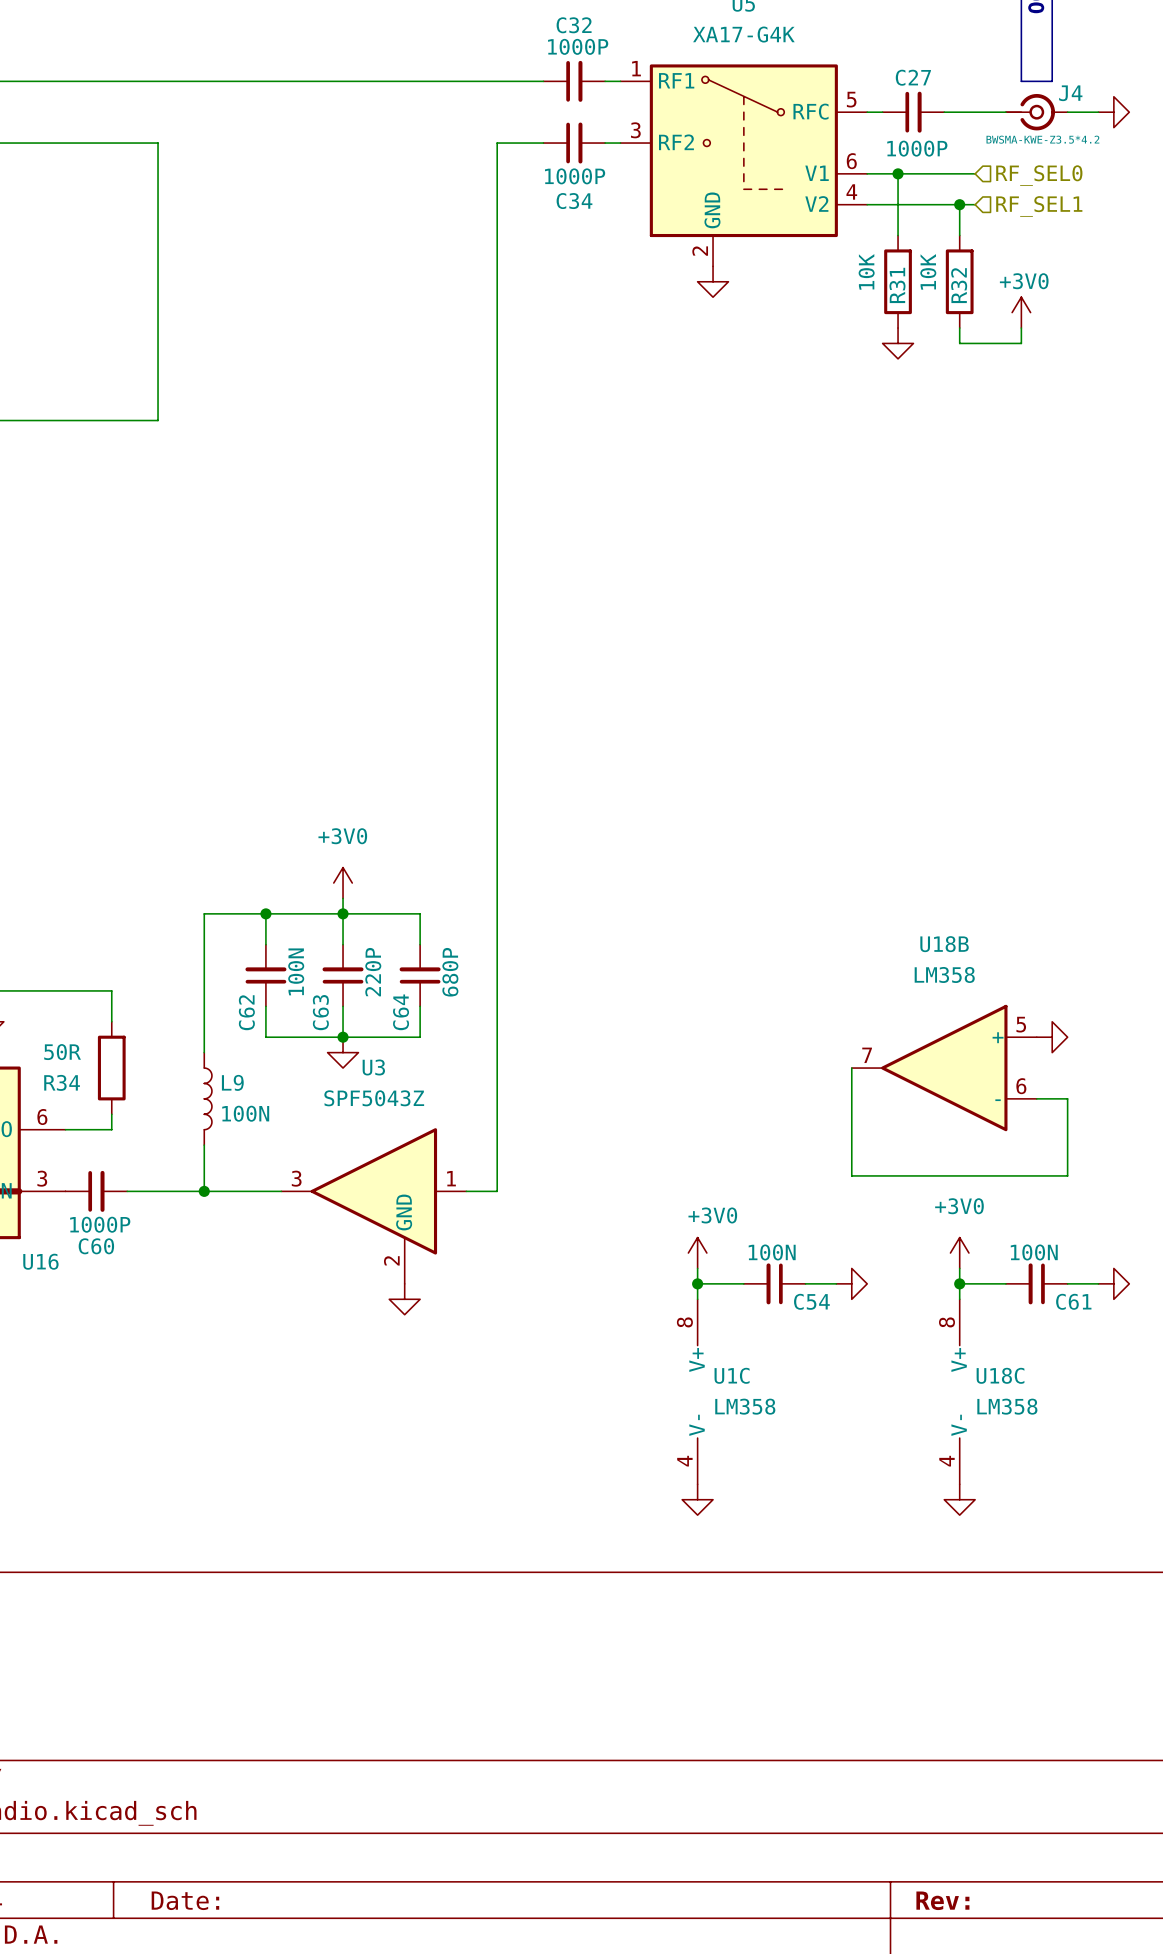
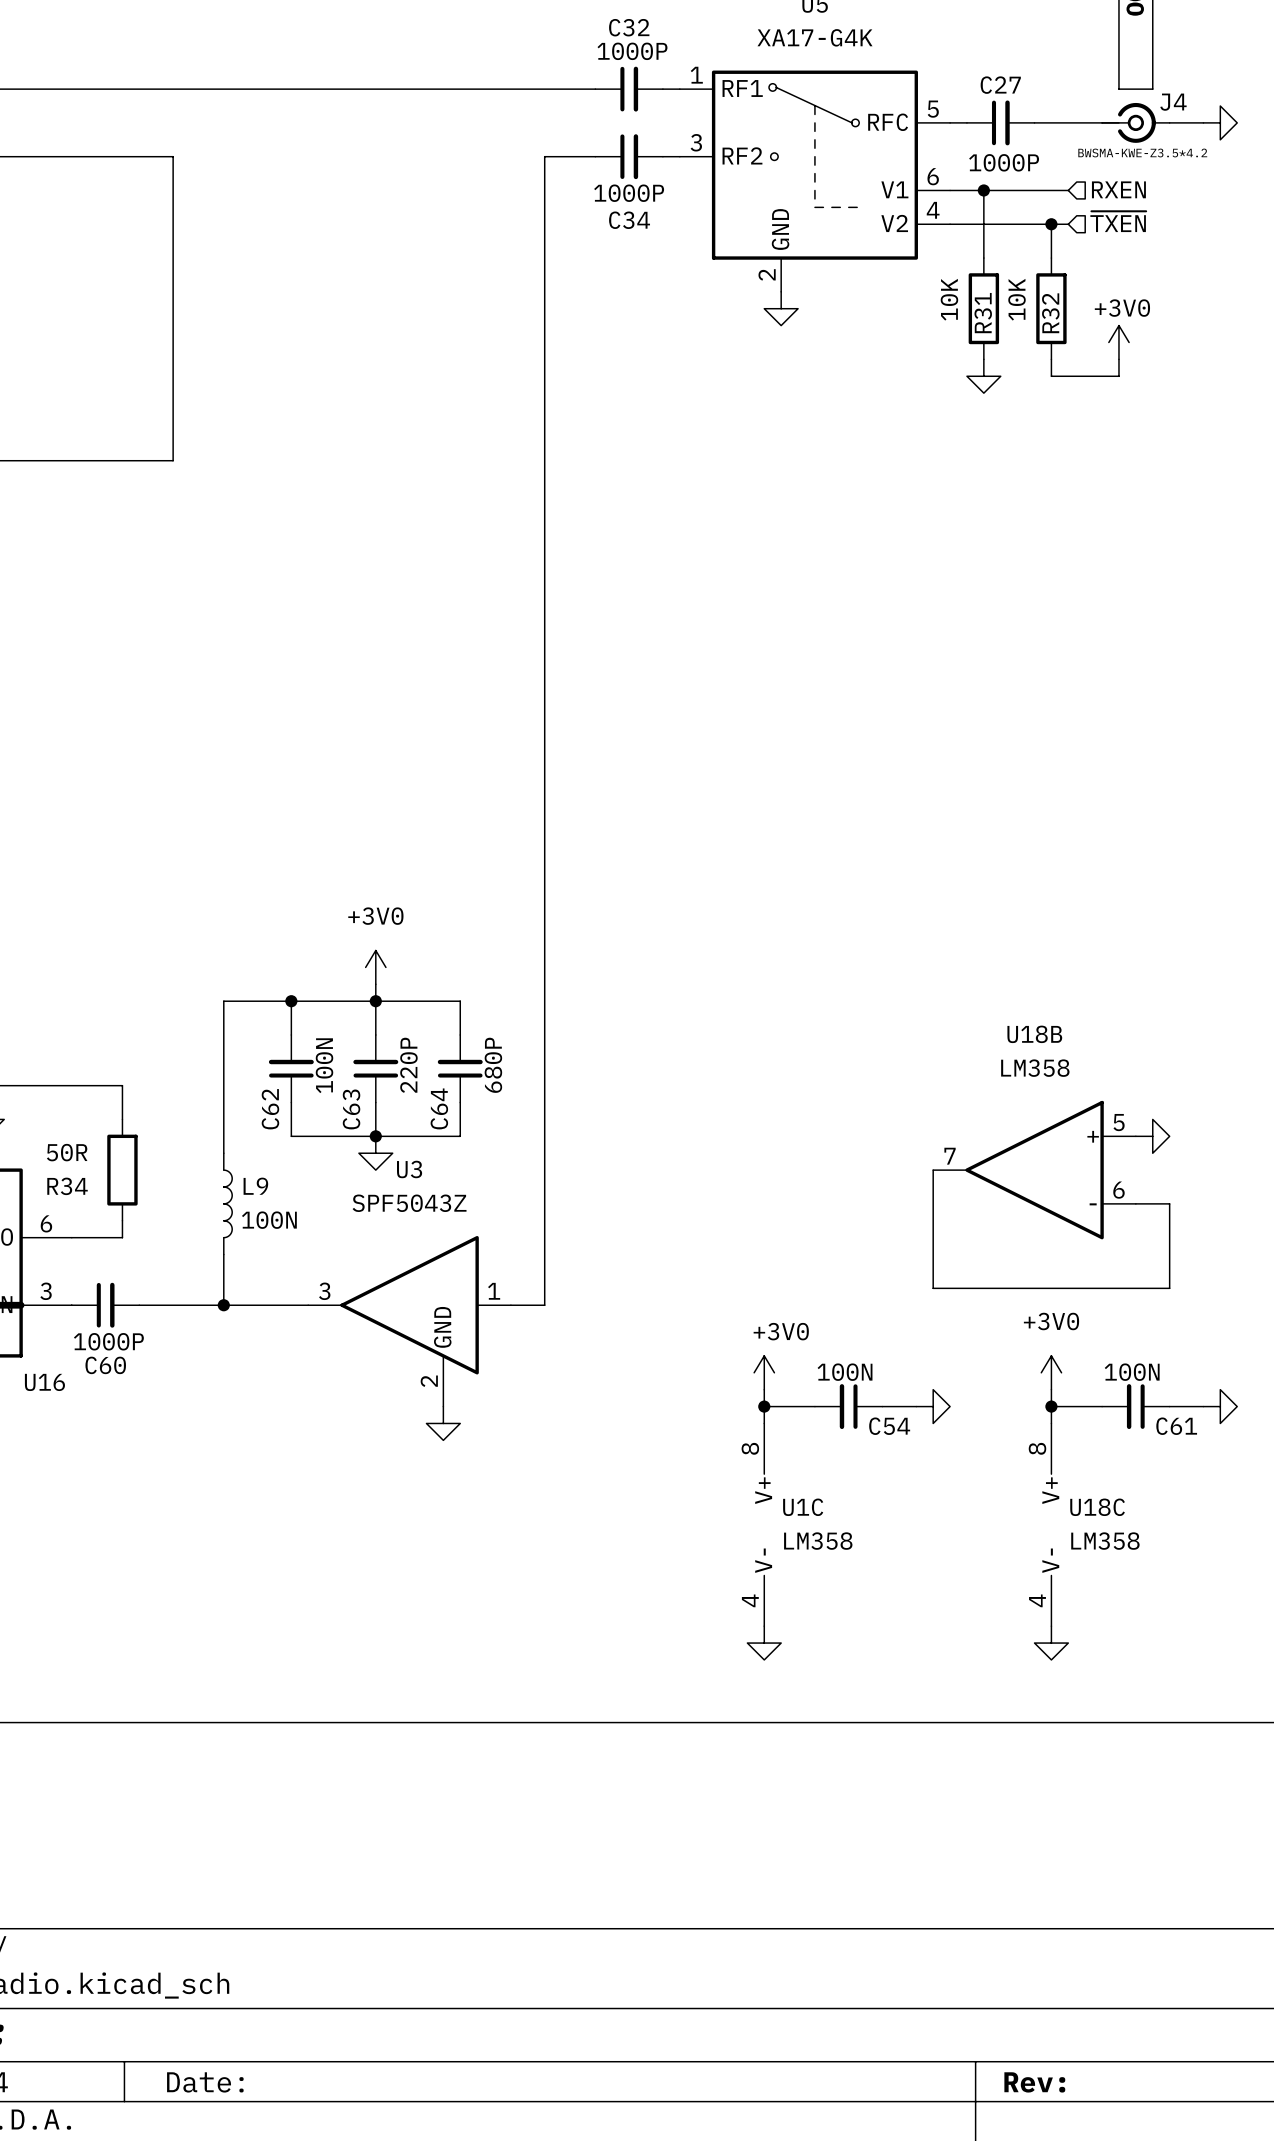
hierarchical label: RF_SEL0 (1039, 175) -> RXEN (1118, 189)
hierarchical label: RF_SEL1 (1039, 206) -> ~{TXEN} (1118, 221)

